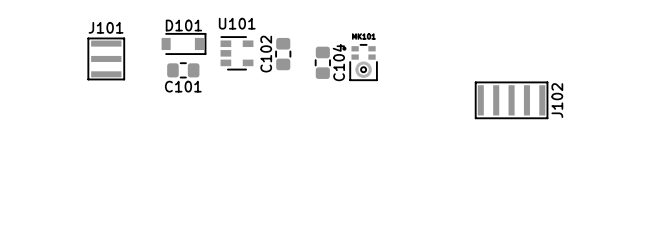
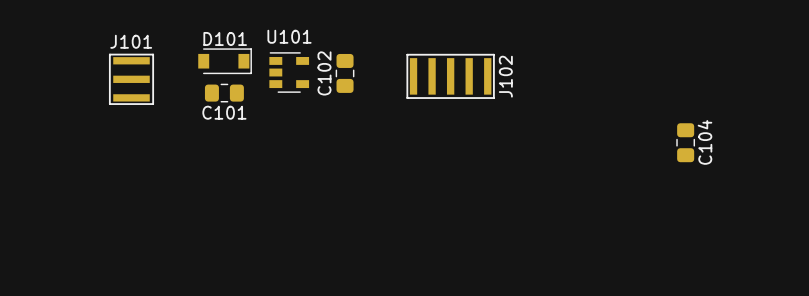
C104 position: (322, 62) -> (685, 142)
part: (359, 62) -> none
J102 position: (511, 100) -> (450, 76)

